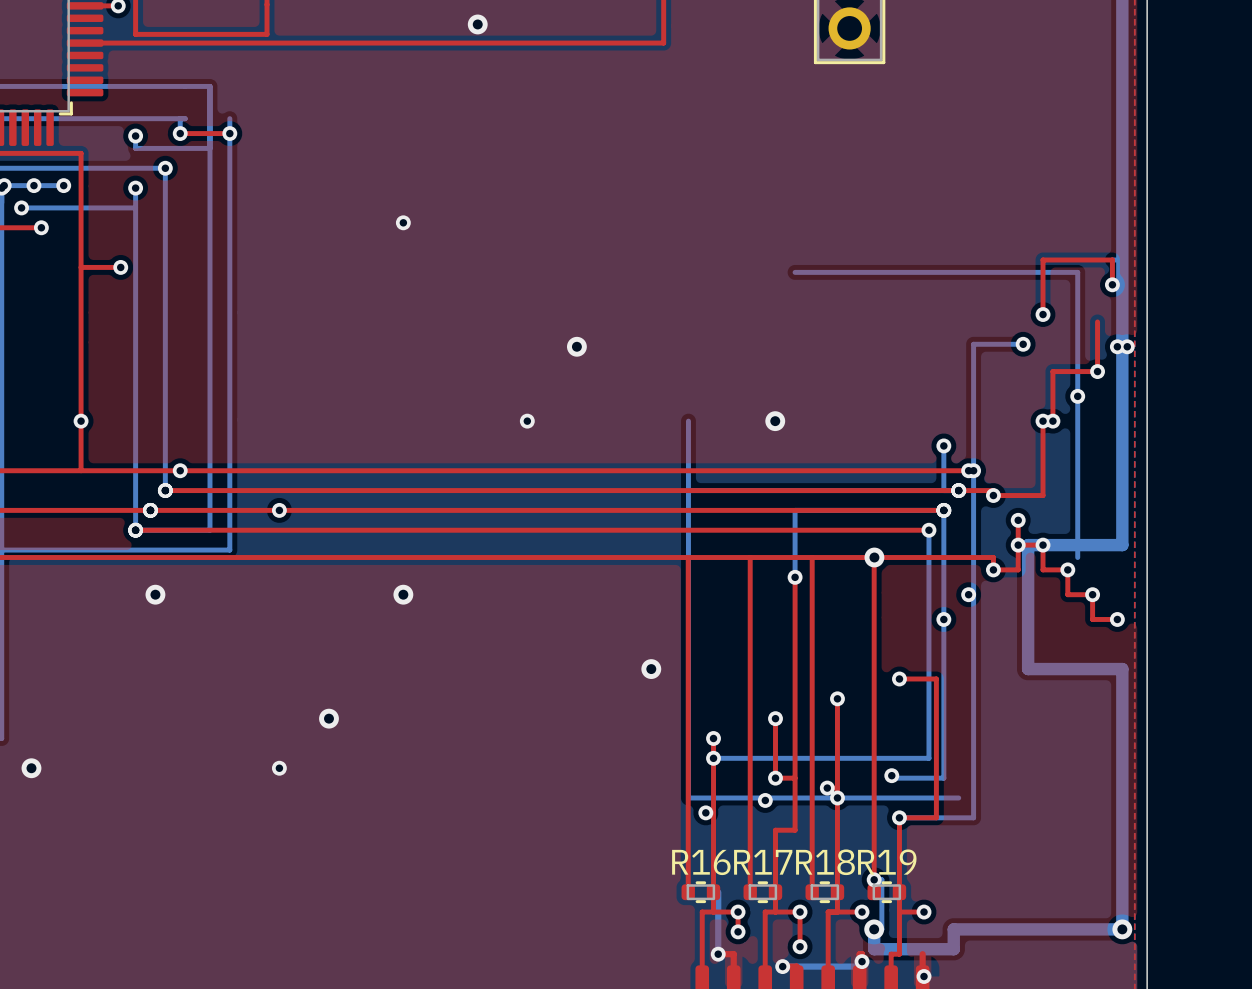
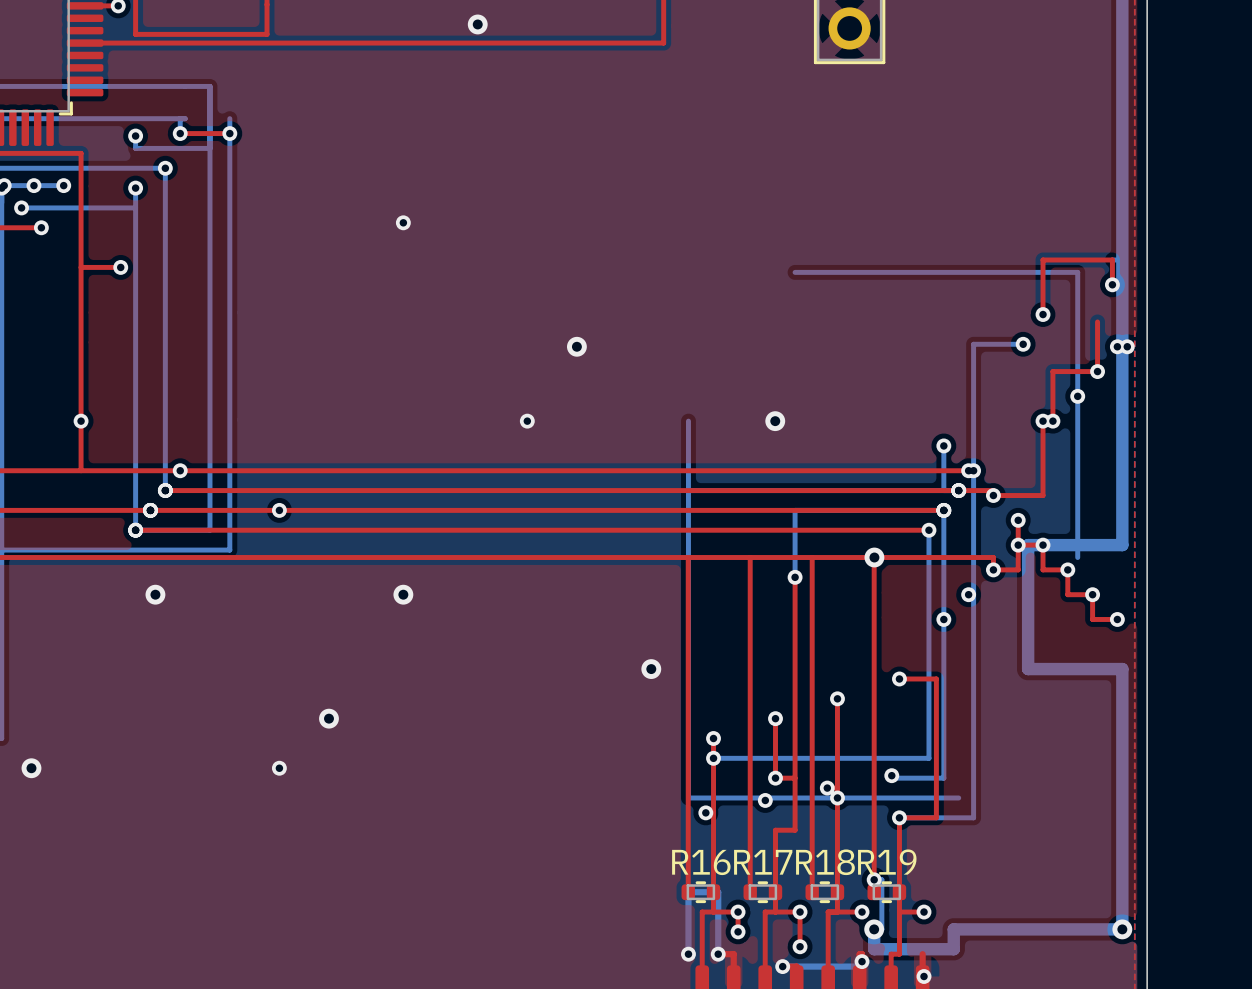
bottom track: none -> (718, 892) (688, 892) (688, 954)
via: none -> (688, 954)

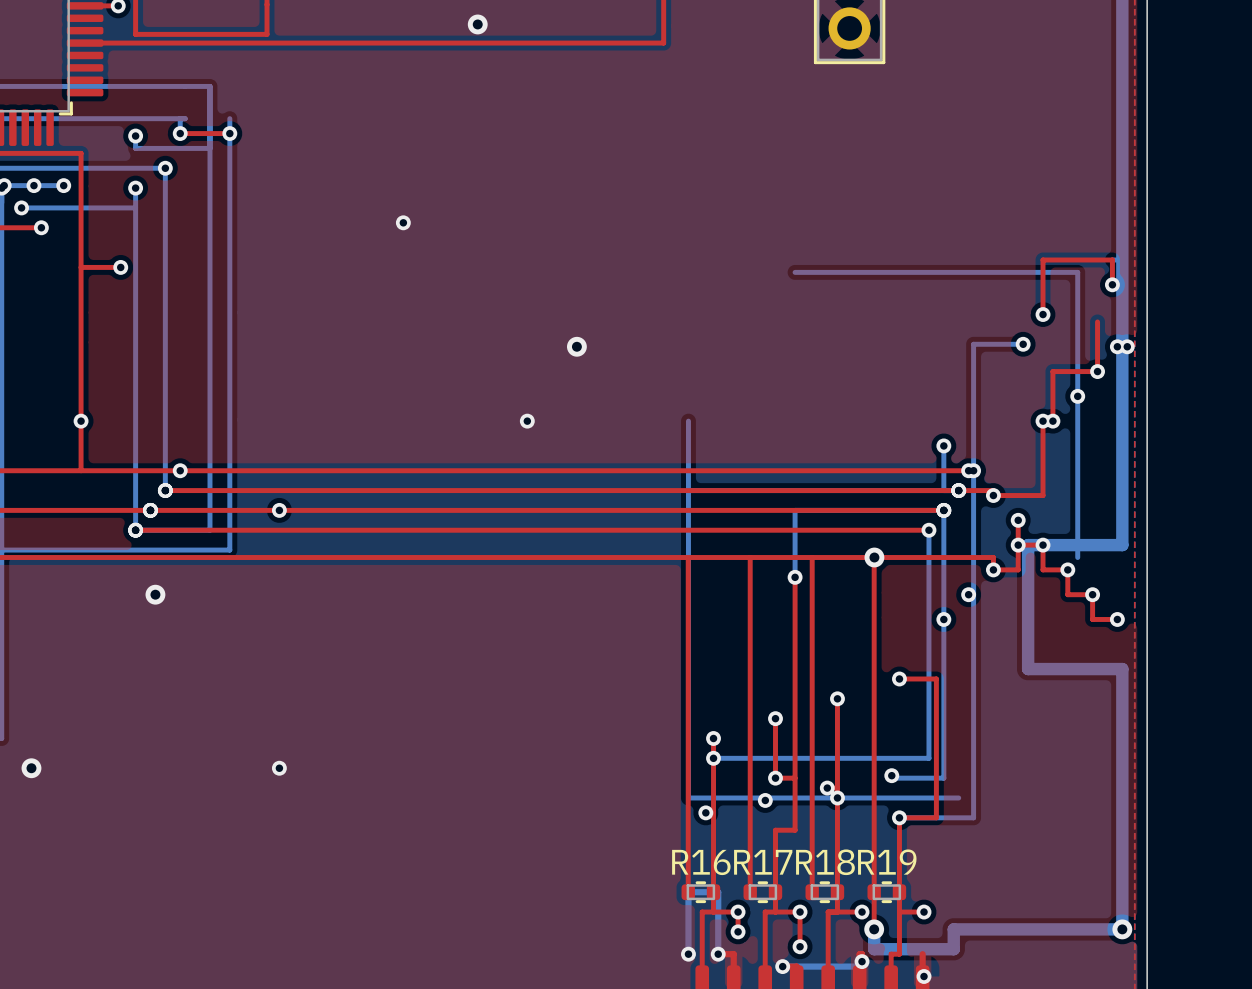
via: (775, 421) -> none
via: (403, 594) -> none
via: (651, 669) -> none
via: (328, 718) -> none
bottom track: (874, 879) (881, 879) (881, 929) (874, 929) -> none
via: (874, 879) -> none
top track: none -> (874, 892) (874, 929)

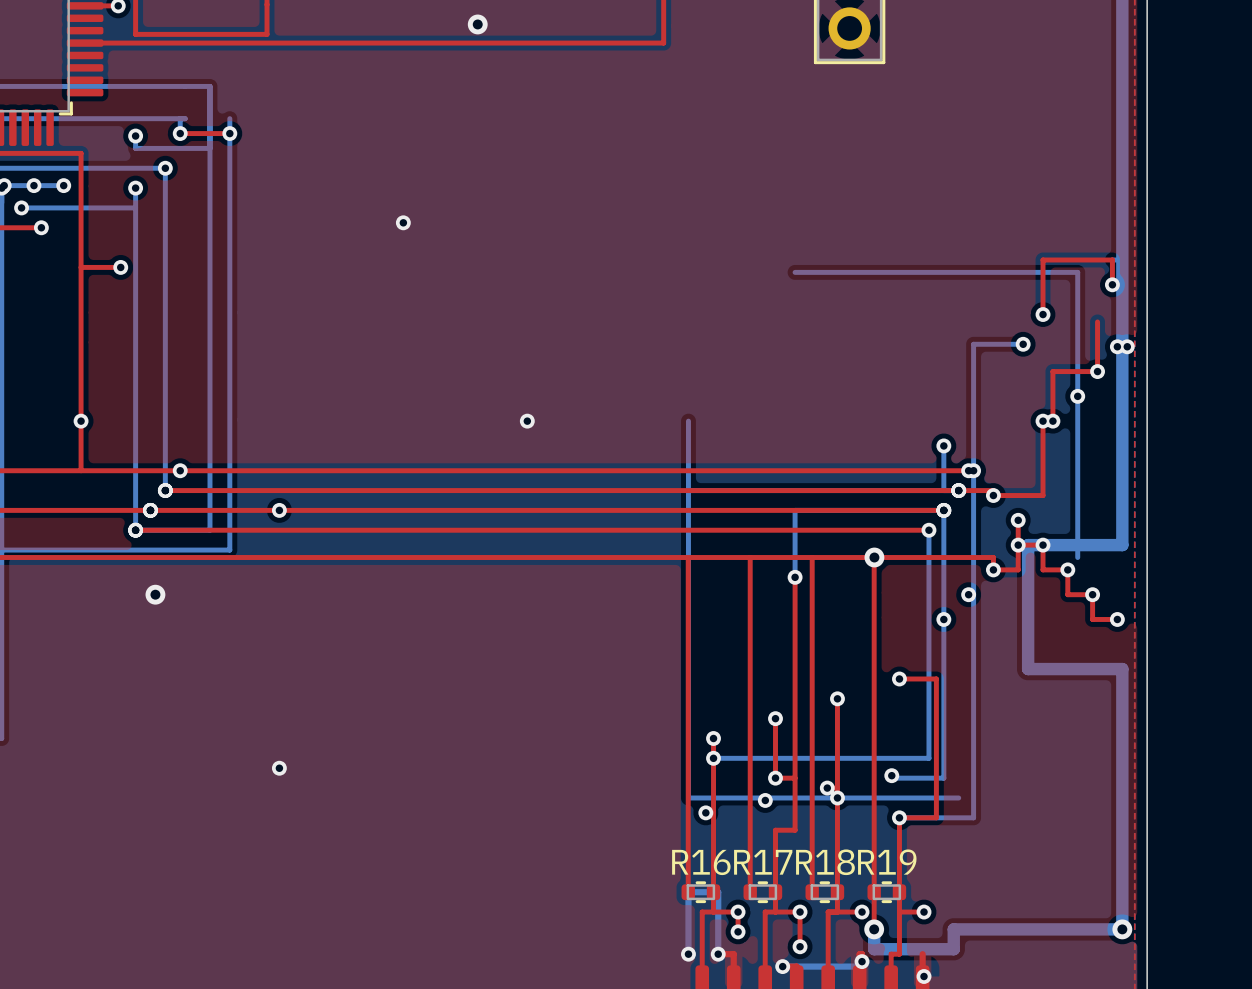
via: (576, 346) -> none
via: (31, 768) -> none

